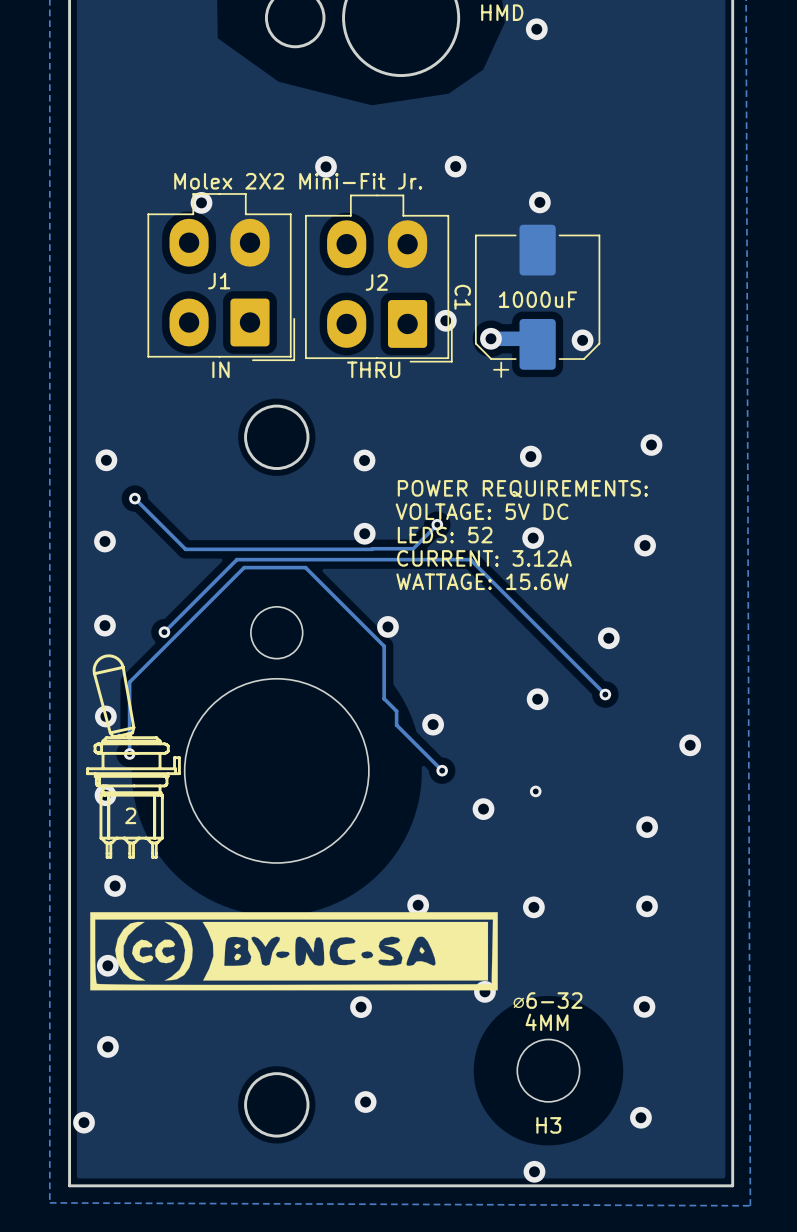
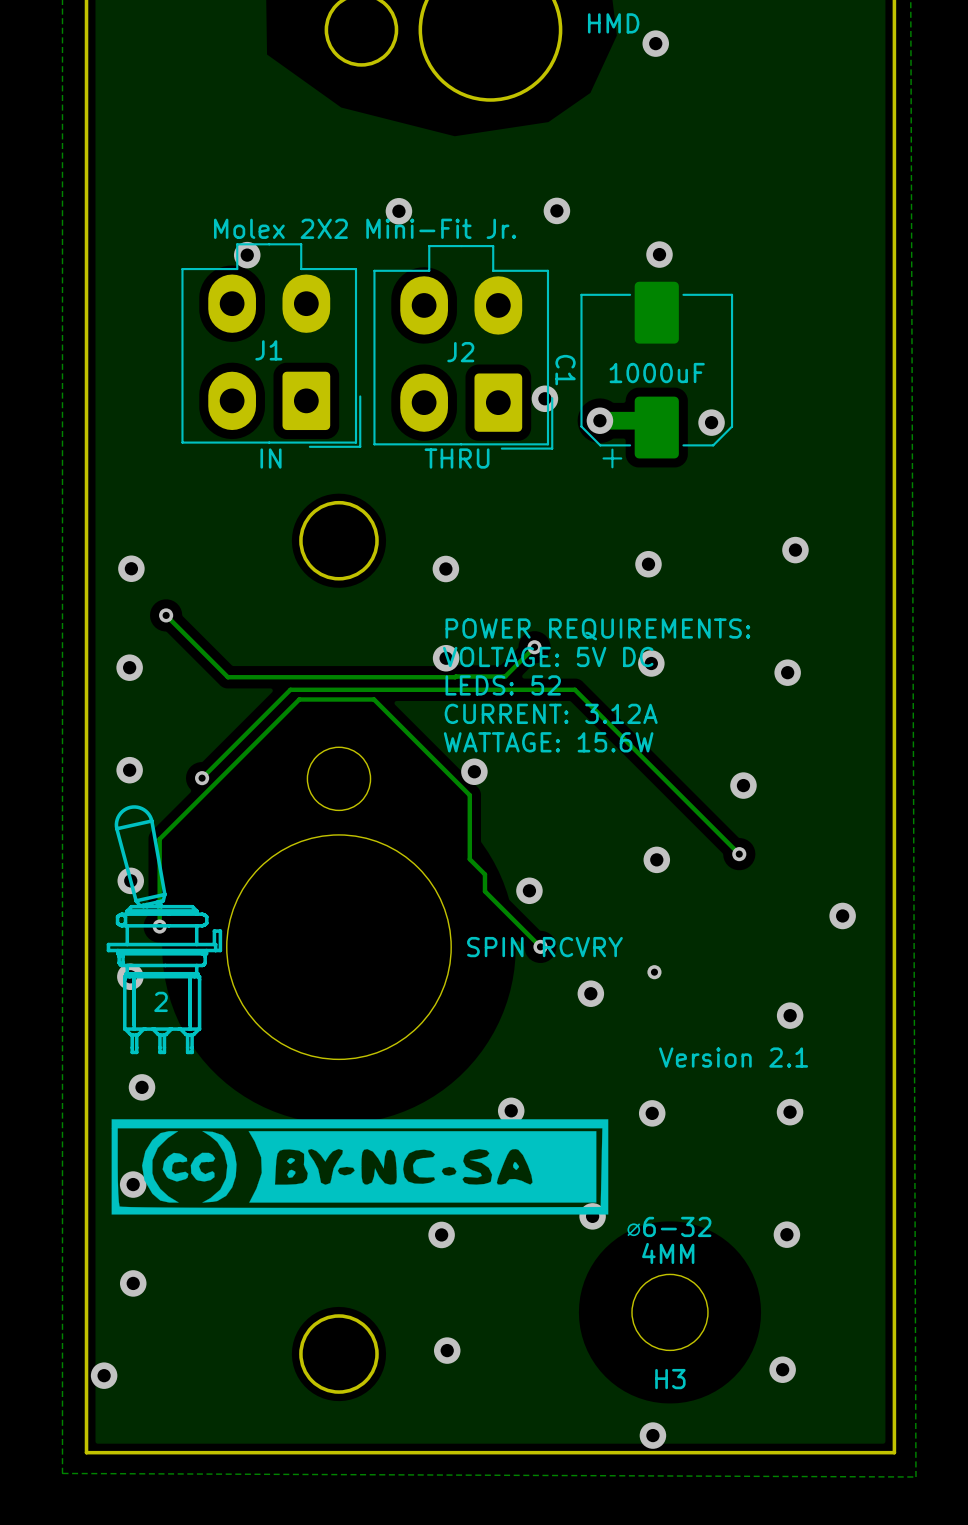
text position: POWER REQUIREMENTS: (522, 489) -> POWER REQUIREMENTS: (597, 629)
text position: VOLTAGE: 5V DC (482, 511) -> VOLTAGE: 5V DC (548, 656)
text position: LEDS: 52 (445, 535) -> LEDS: 52 (503, 685)
text position: CURRENT: 3.12A (484, 558) -> CURRENT: 3.12A (551, 713)
text position: WATTAGE: 15.6W (482, 581) -> WATTAGE: 15.6W (548, 742)
text: none -> SPIN RCVRY (544, 947)
text: none -> Version 2.1 (733, 1057)

